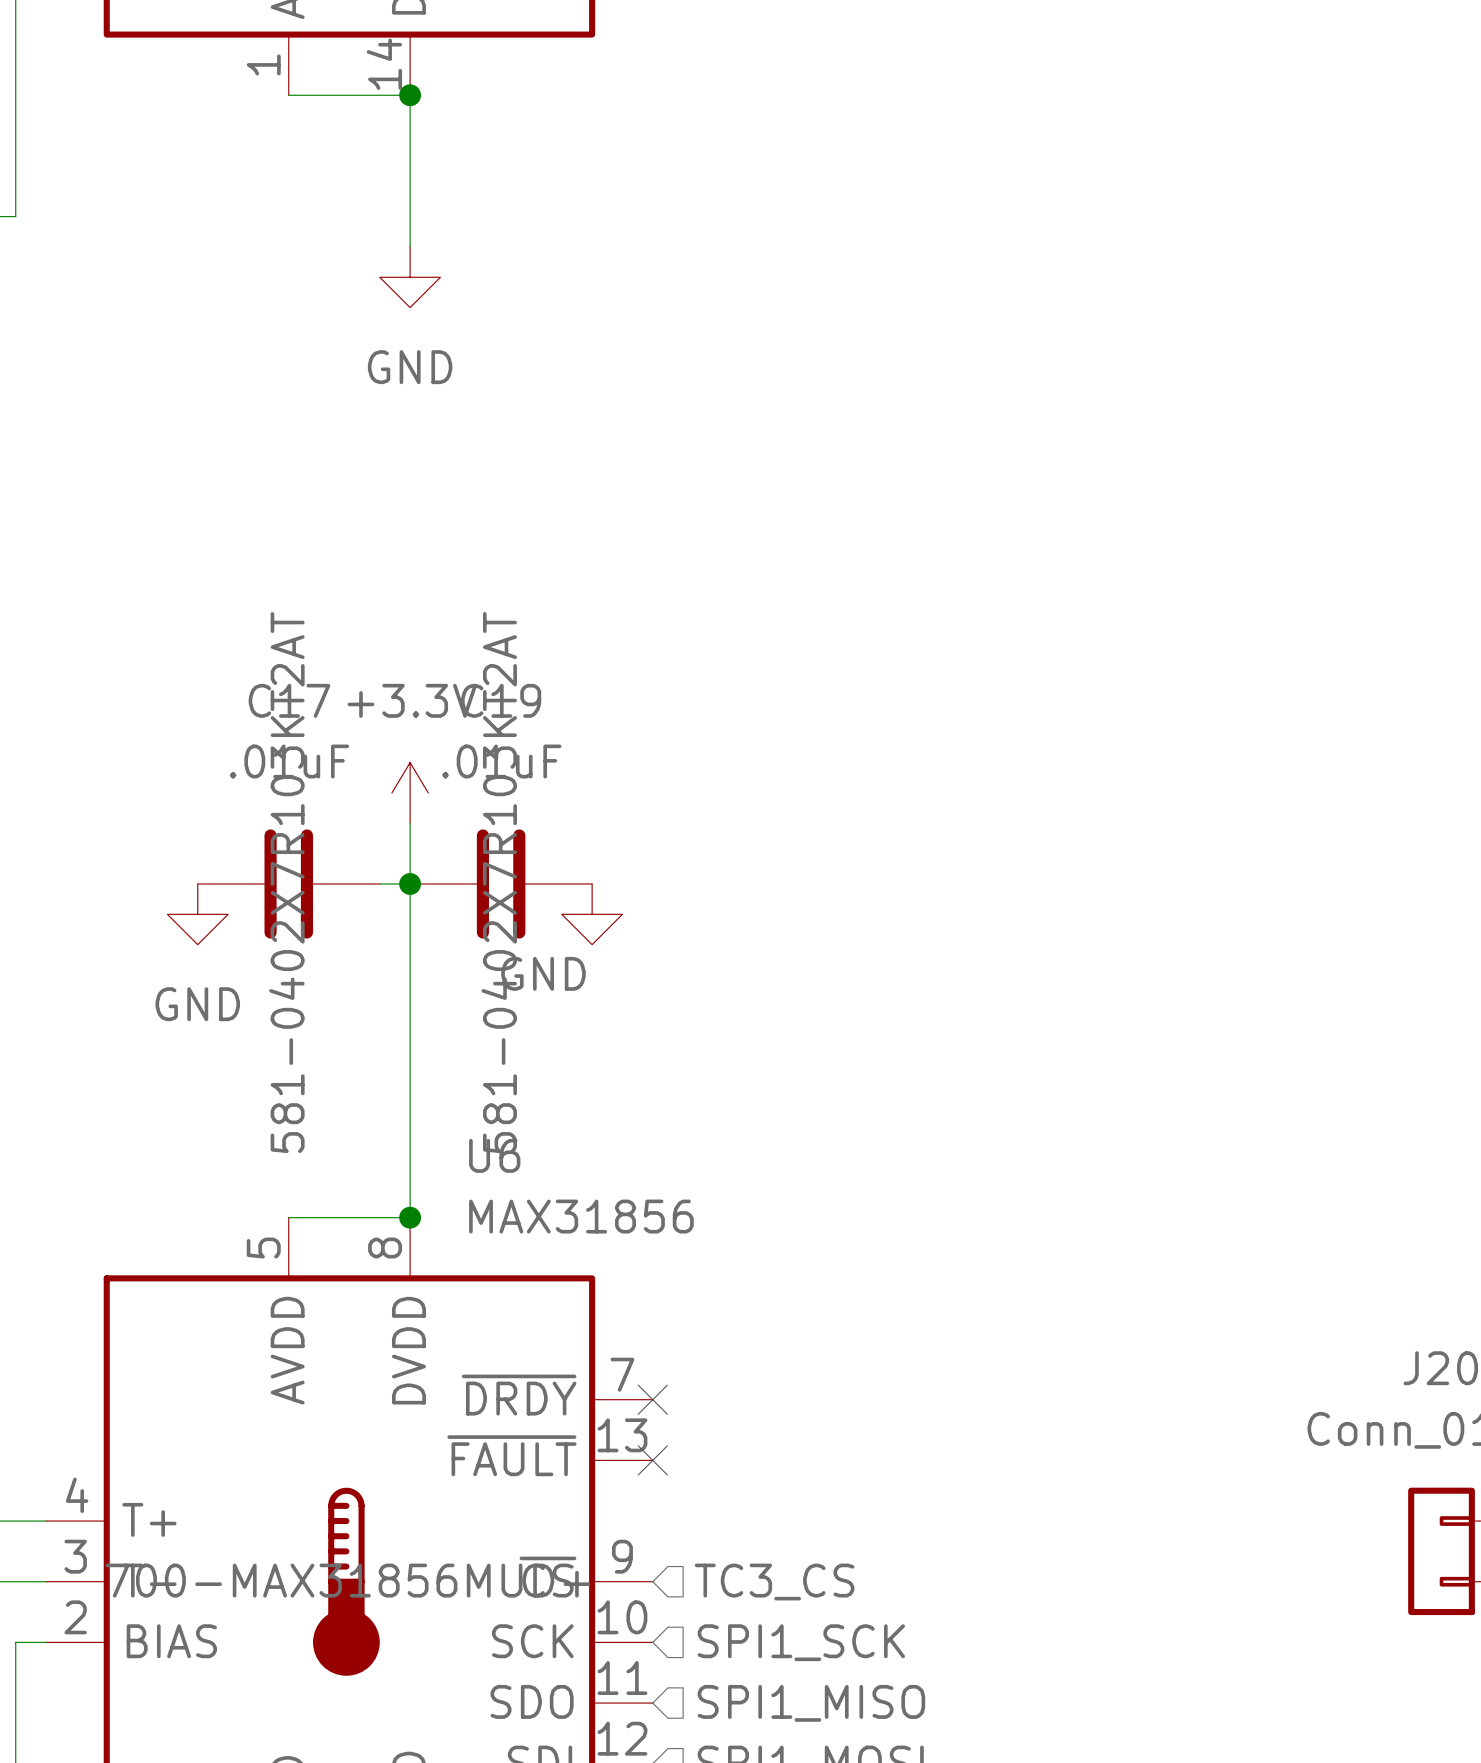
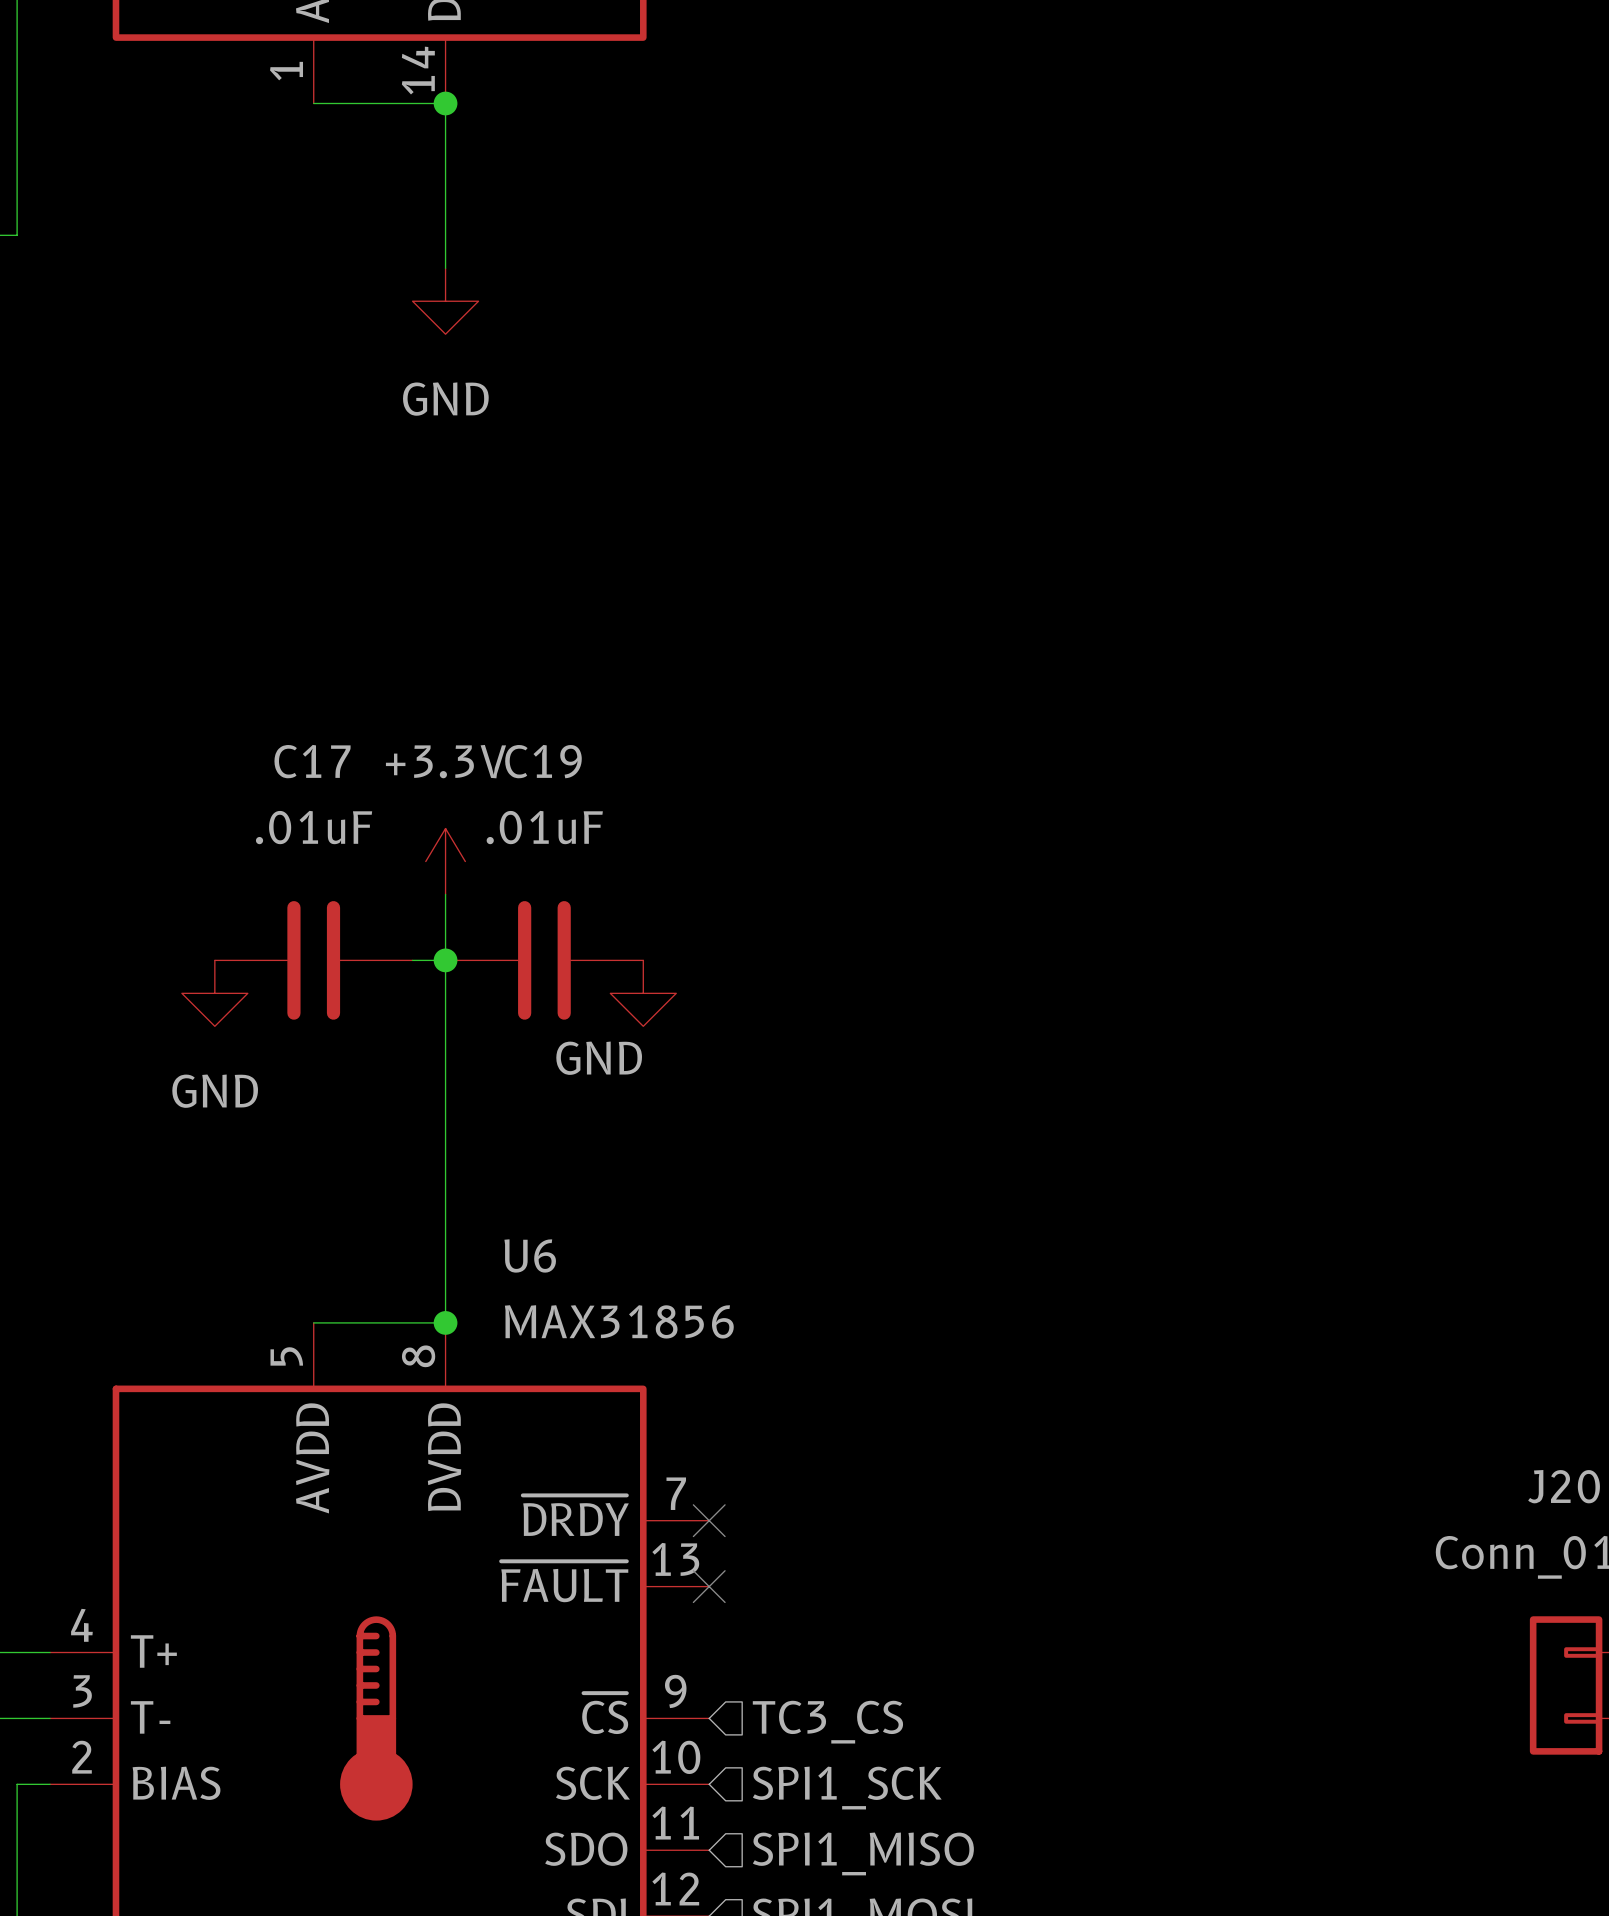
C17 text: 581-0402X7R103KT2AT (286, 882) -> none
C19 text: 581-0402X7R103KT2AT (499, 882) -> none
U6 text: 700-MAX31856MUD+ (347, 1580) -> none

